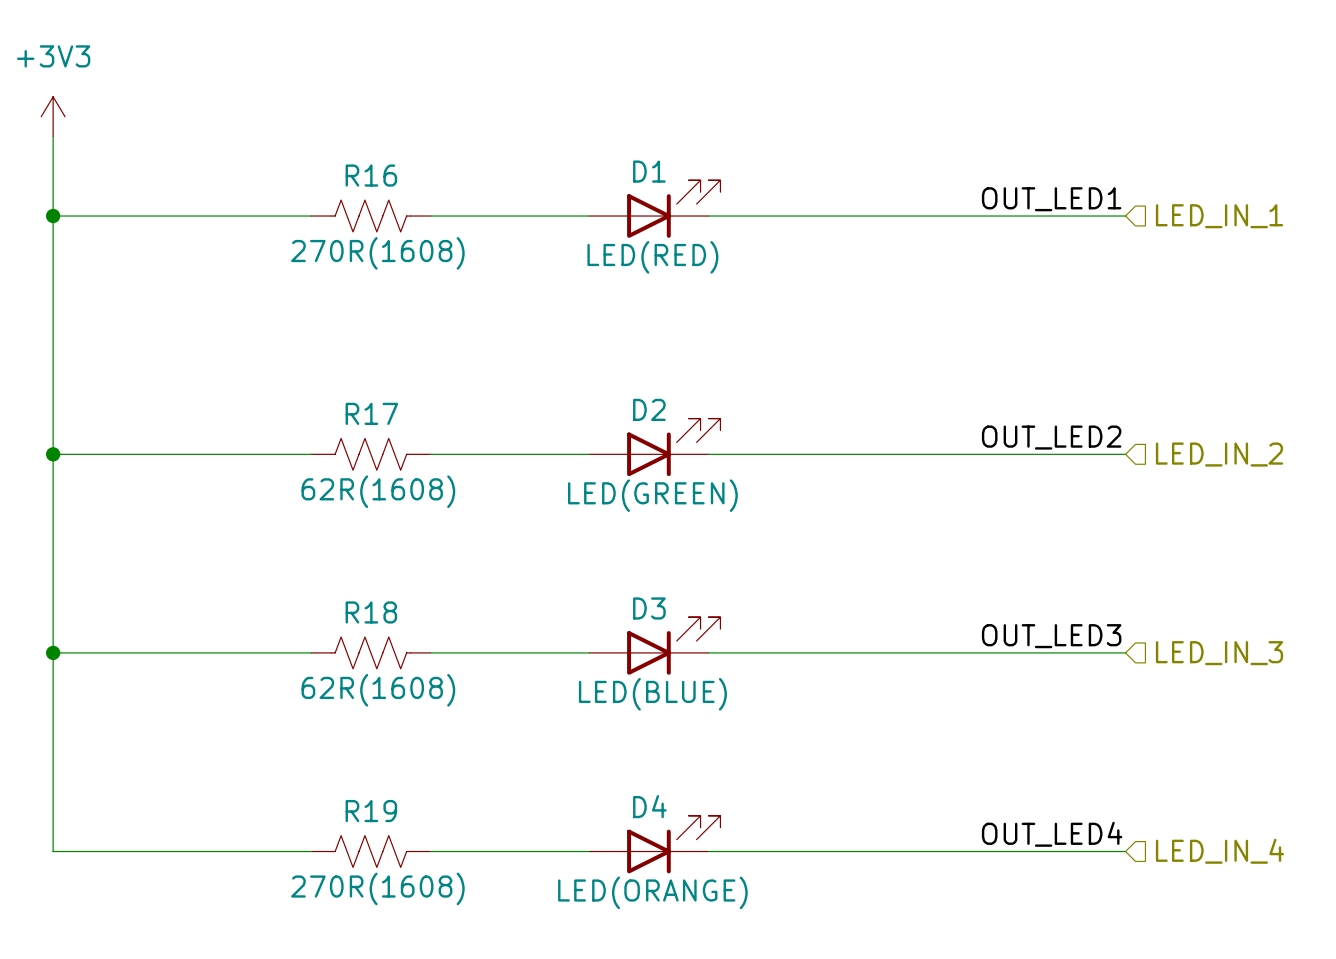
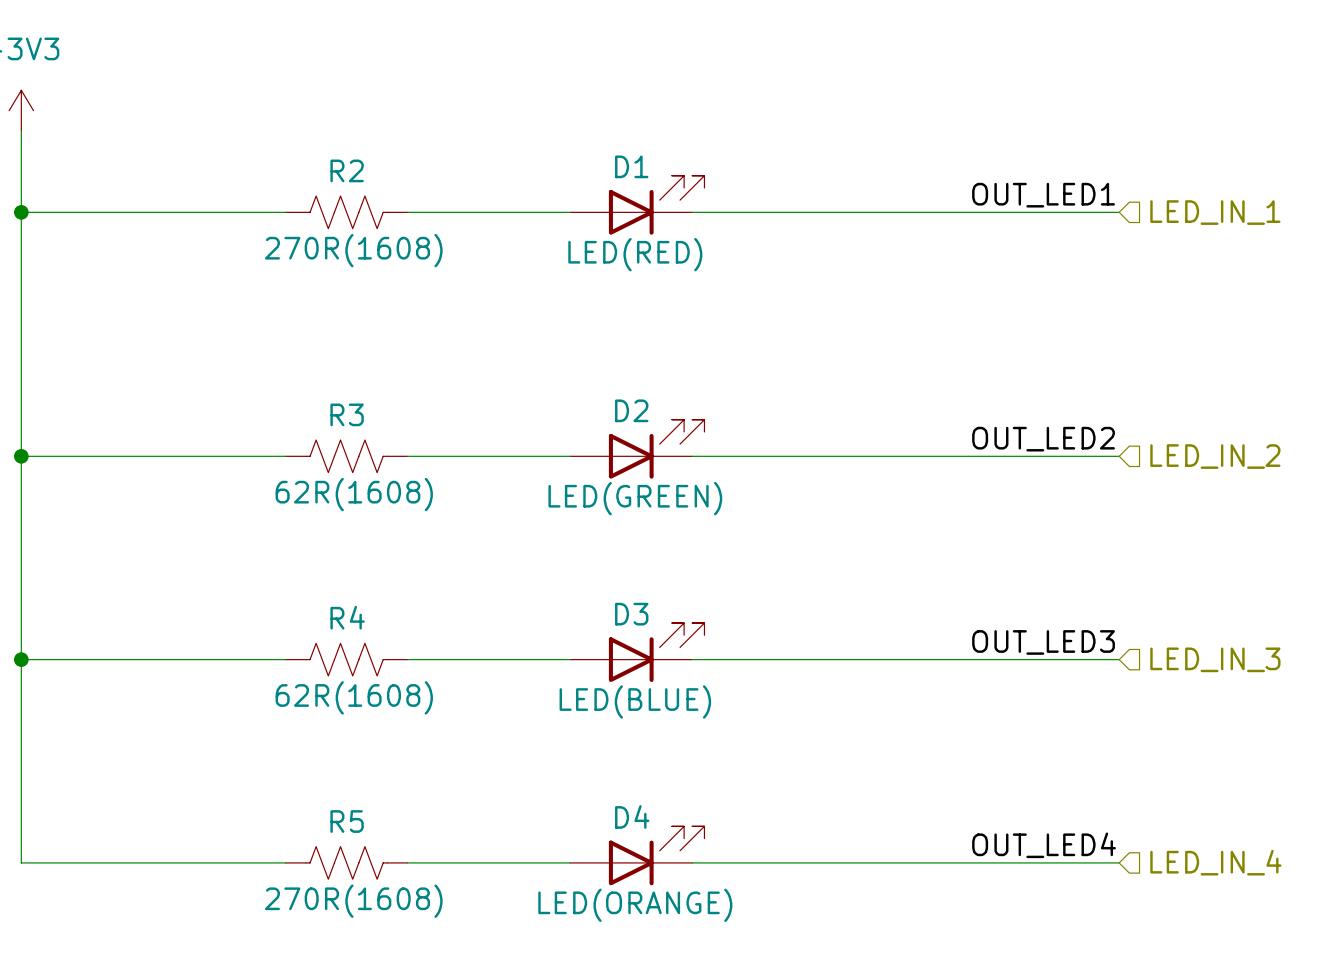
R16 name: R16 (371, 175) -> R2 (347, 170)
R17 name: R17 (371, 413) -> R3 (347, 414)
R18 name: R18 (371, 612) -> R4 (347, 617)
R19 name: R19 (371, 811) -> R5 (347, 821)

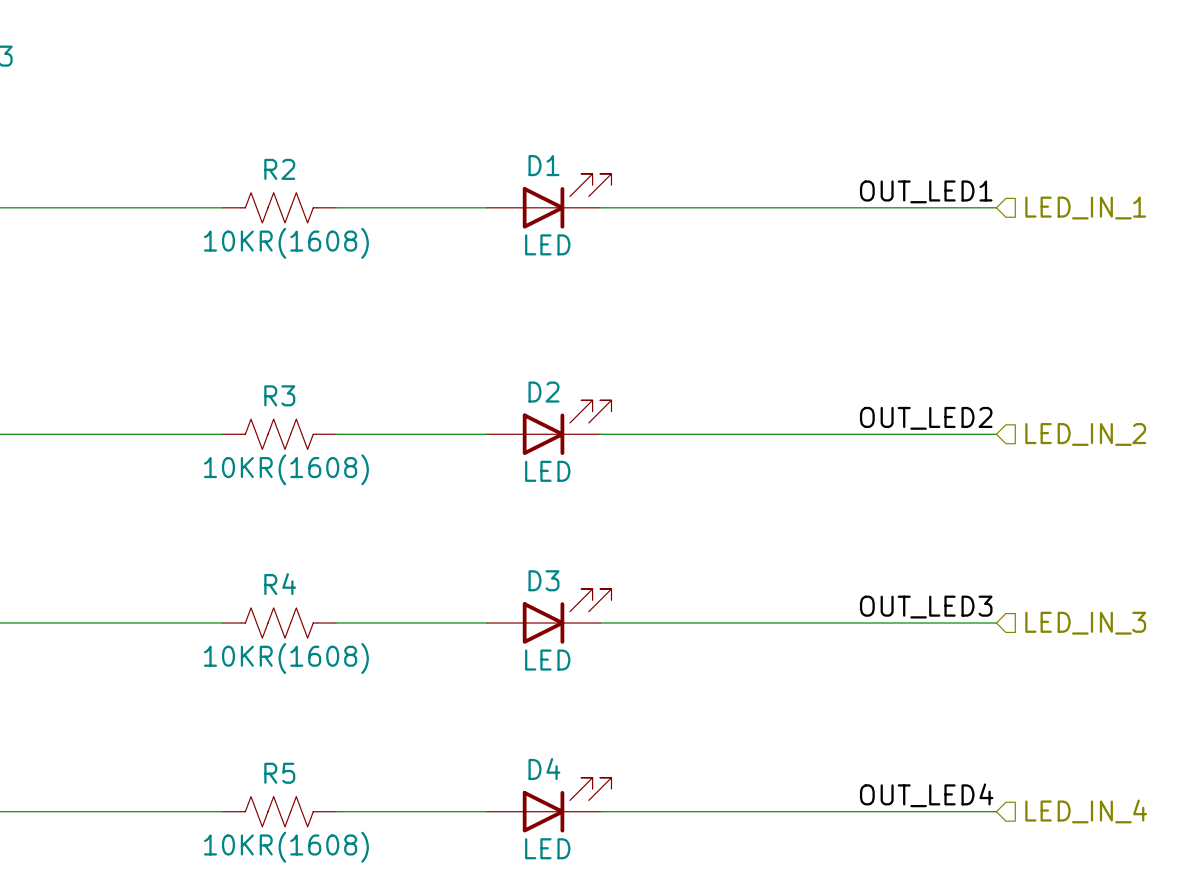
R2 value: 270R(1608) (353, 250) -> 10KR(1608) (286, 243)
D1 value: LED(RED) (635, 254) -> LED (547, 244)
R3 value: 62R(1608) (354, 494) -> 10KR(1608) (286, 469)
D2 value: LED(GREEN) (635, 498) -> LED (547, 471)
R4 value: 62R(1608) (354, 697) -> 10KR(1608) (286, 658)
D3 value: LED(BLUE) (635, 701) -> LED (547, 660)
R5 value: 270R(1608) (353, 901) -> 10KR(1608) (286, 847)
D4 value: LED(ORANGE) (635, 905) -> LED (547, 848)

